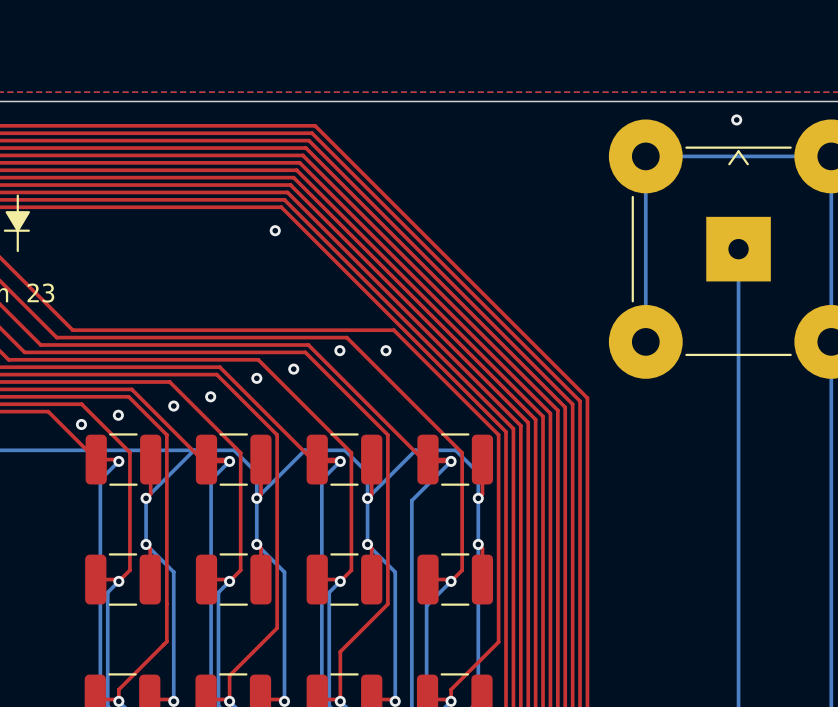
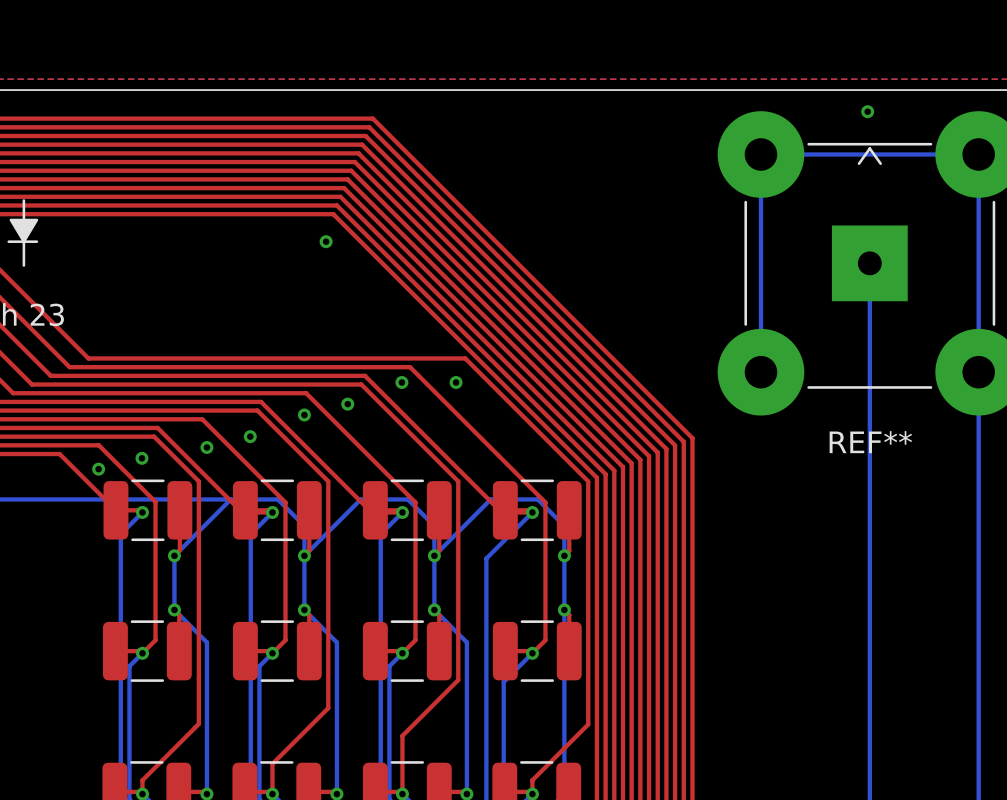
REF** name: none -> REF** (870, 442)

